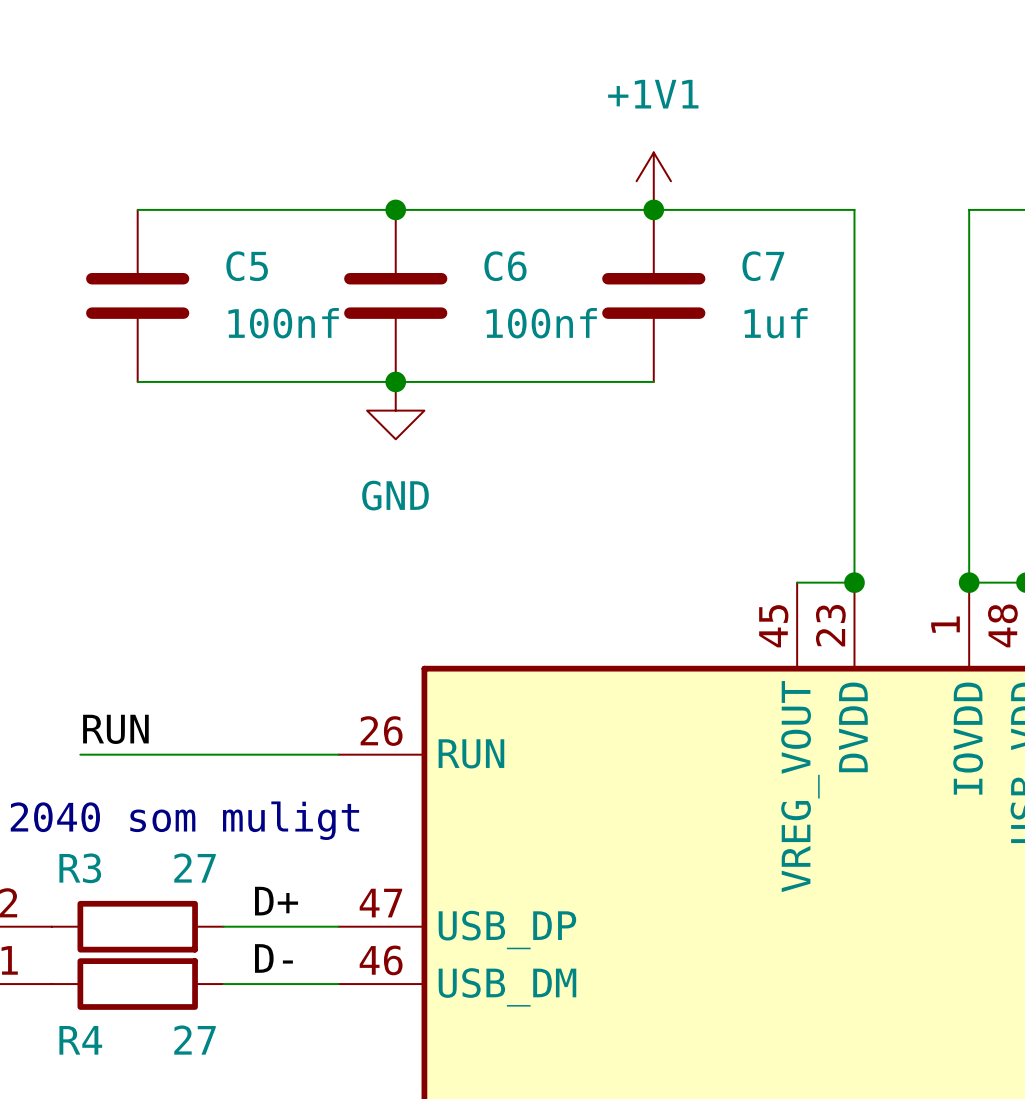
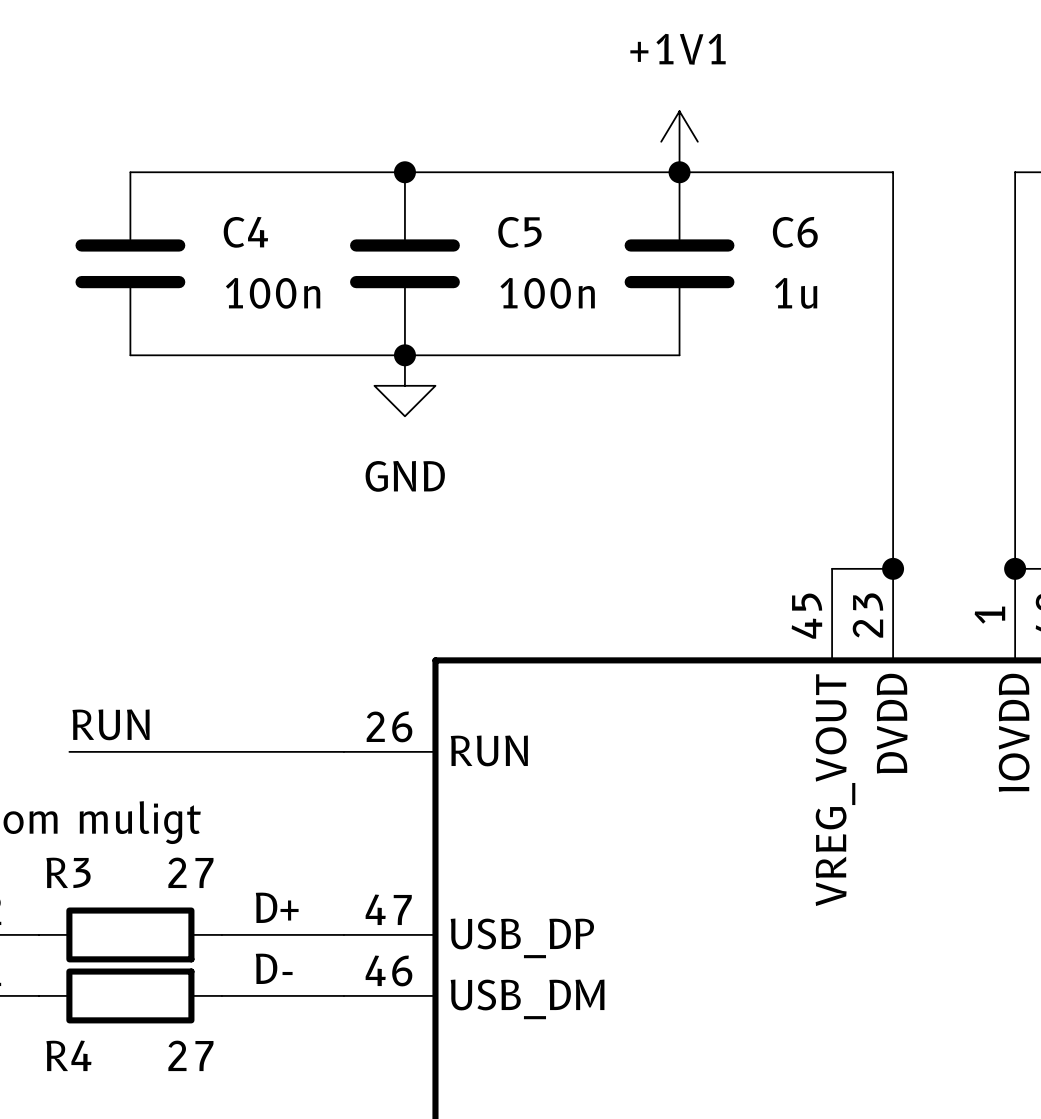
C5 name: C5 (247, 266) -> C4 (245, 232)
C6 name: C6 (505, 266) -> C5 (519, 232)
C7 name: C7 (763, 266) -> C6 (795, 232)
C5 value: 100nf (283, 323) -> 100n (273, 293)
C6 value: 100nf (541, 323) -> 100n (547, 293)
C7 value: 1uf (776, 323) -> 1u (796, 293)

